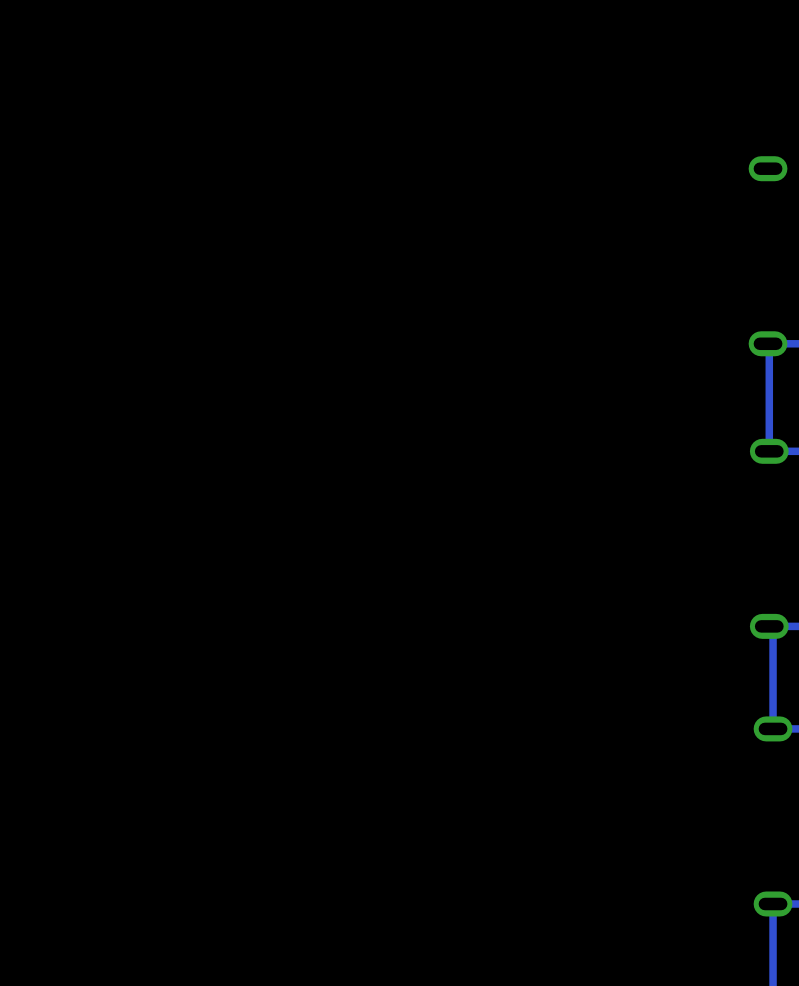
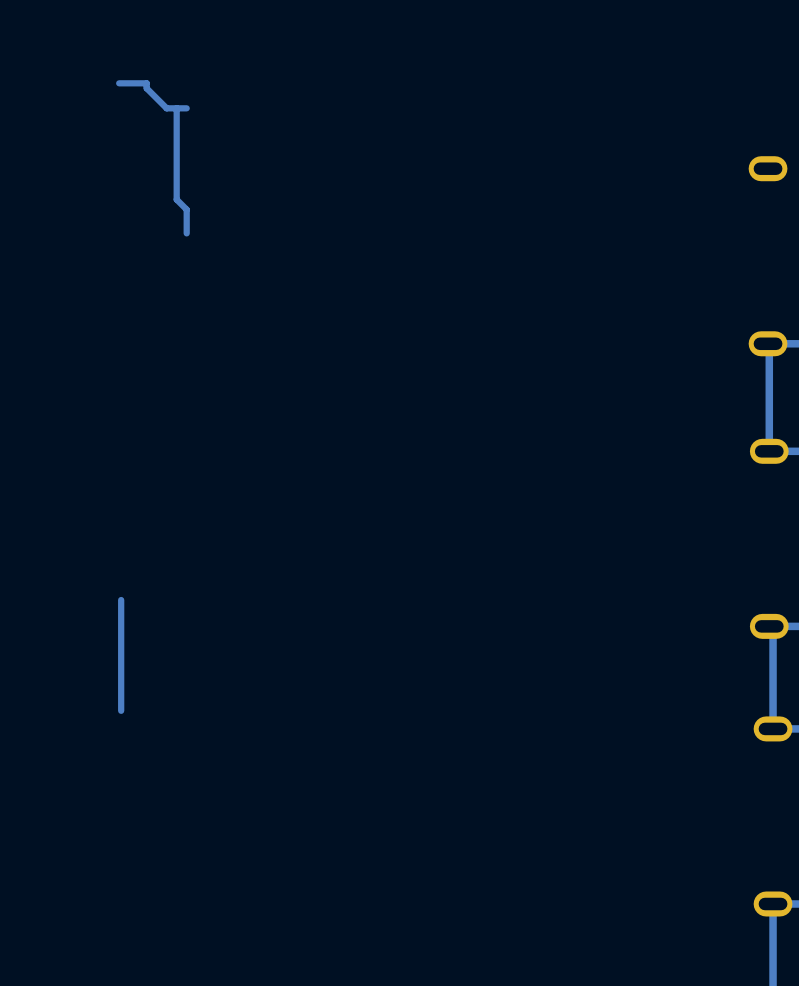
track: none -> (119, 83) (146, 83) (146, 88) (166, 108) (186, 108)
track: none -> (176, 108) (176, 199) (186, 209) (186, 233)
track: none -> (121, 600) (121, 710)

